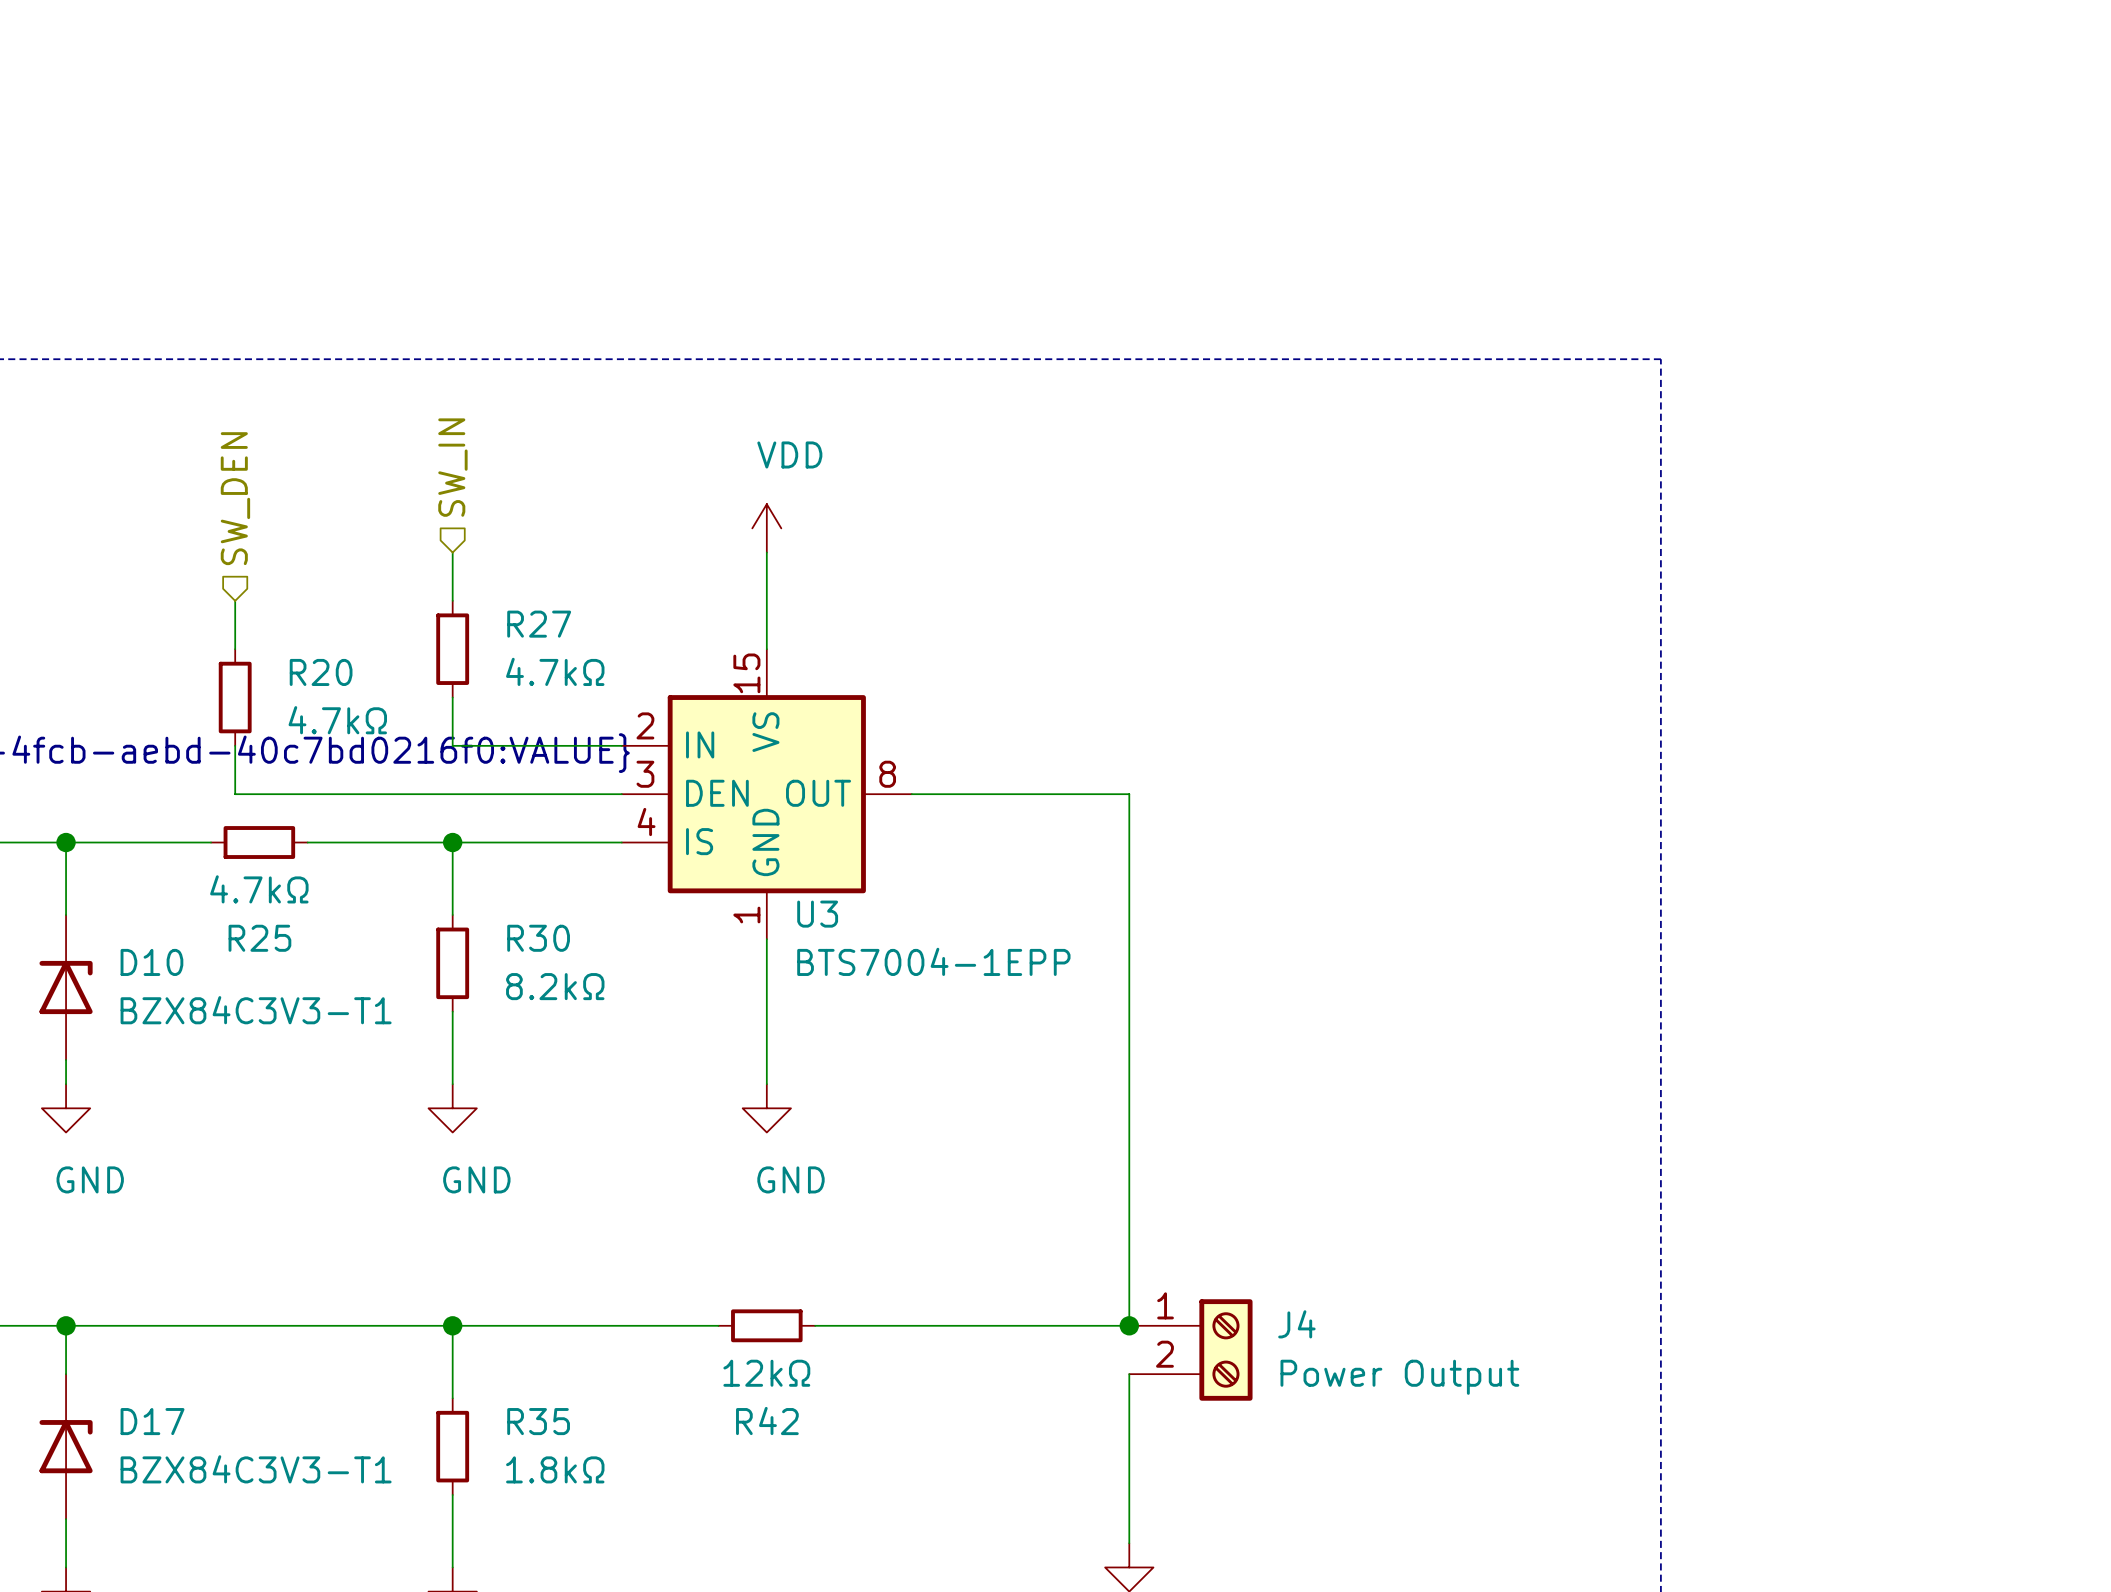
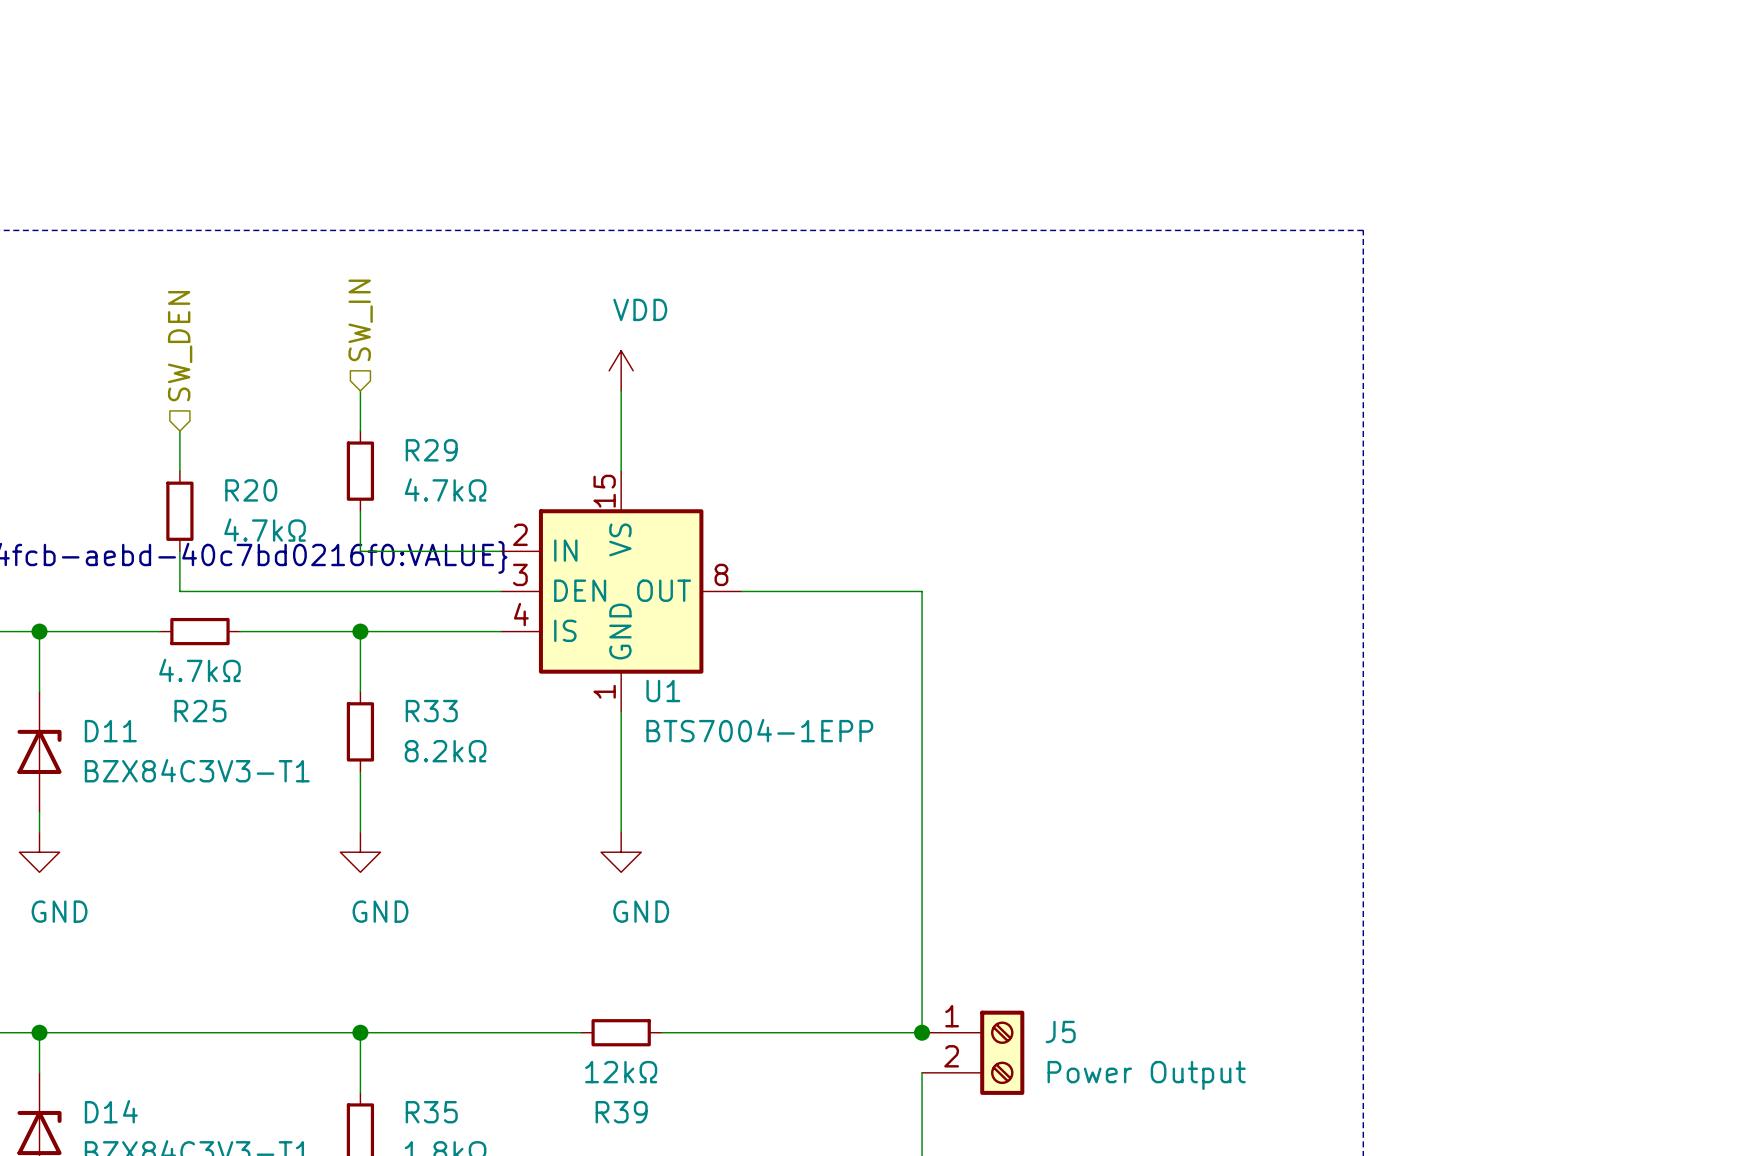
R27 name: R27 (539, 624) -> R29 (431, 450)
U3 name: U3 (817, 914) -> U1 (663, 691)
R30 name: R30 (538, 938) -> R33 (431, 711)
D10 name: D10 (151, 962) -> D11 (110, 731)
J4 name: J4 (1296, 1324) -> J5 (1060, 1031)
R42 name: R42 (767, 1420) -> R39 (621, 1112)
D17 name: D17 (152, 1421) -> D14 (111, 1111)

